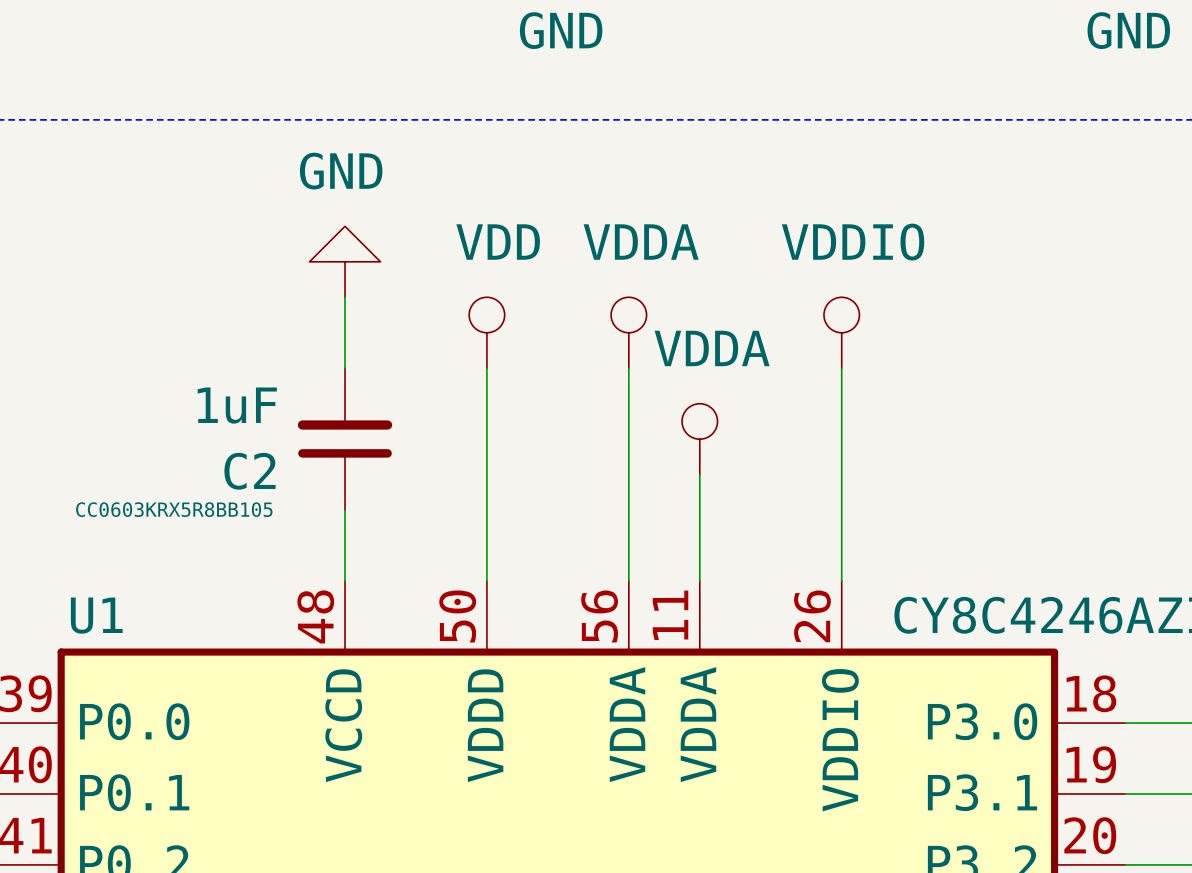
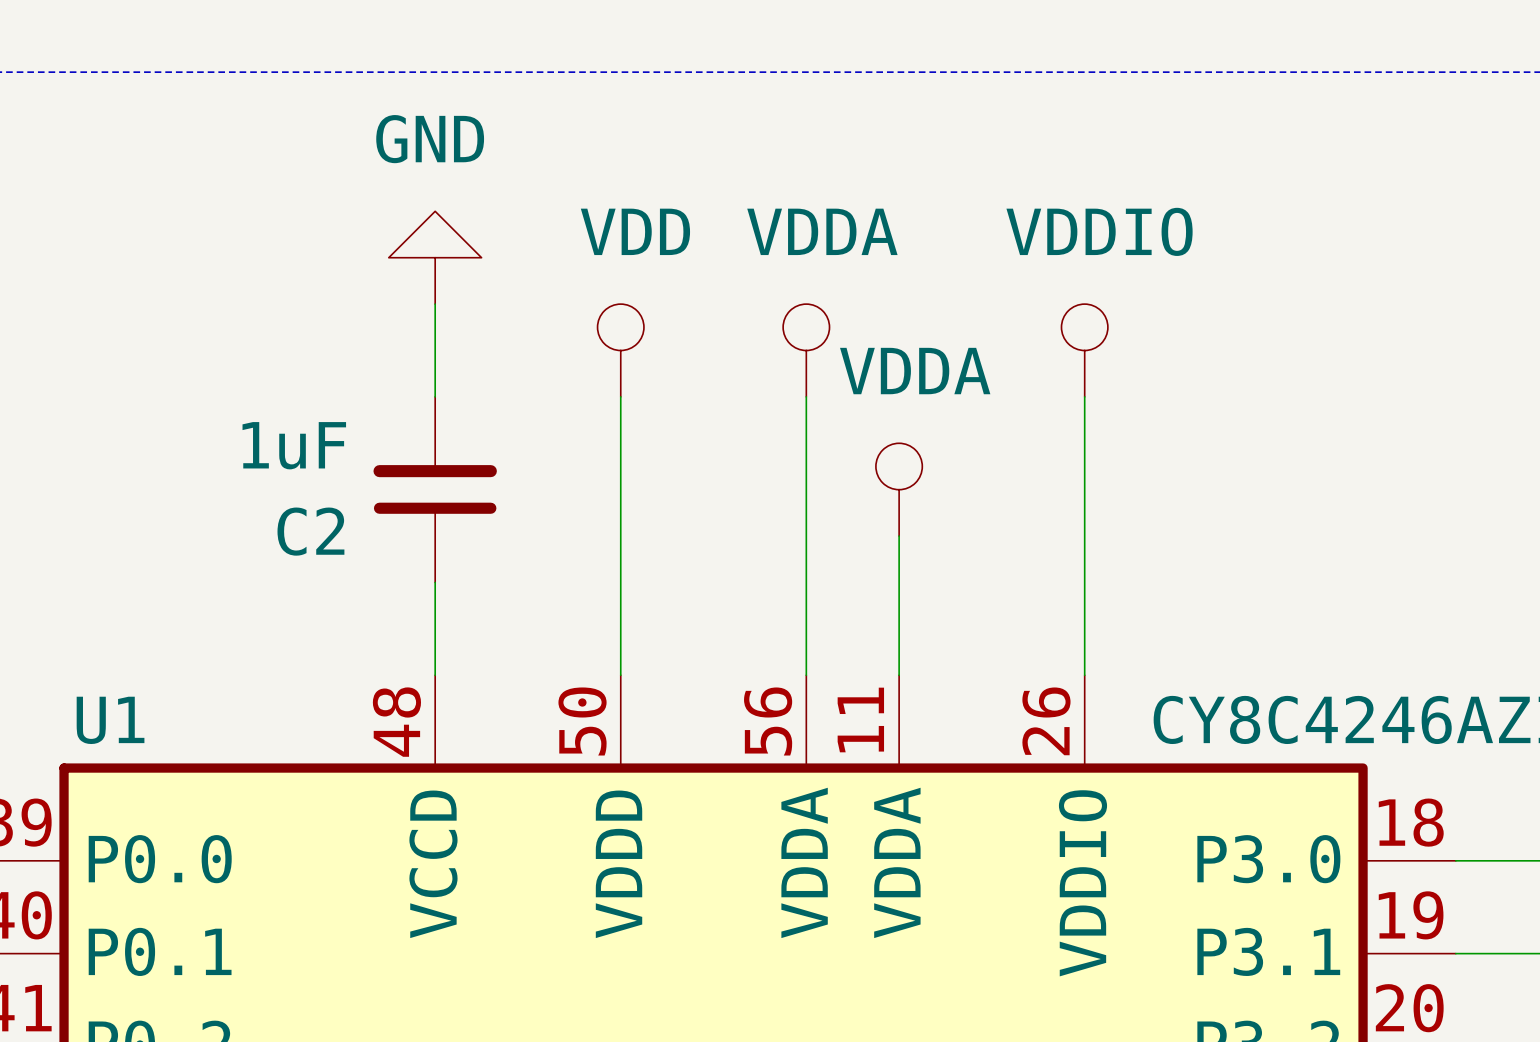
C2 text: CC0603KRX5R8BB105 (174, 509) -> none

